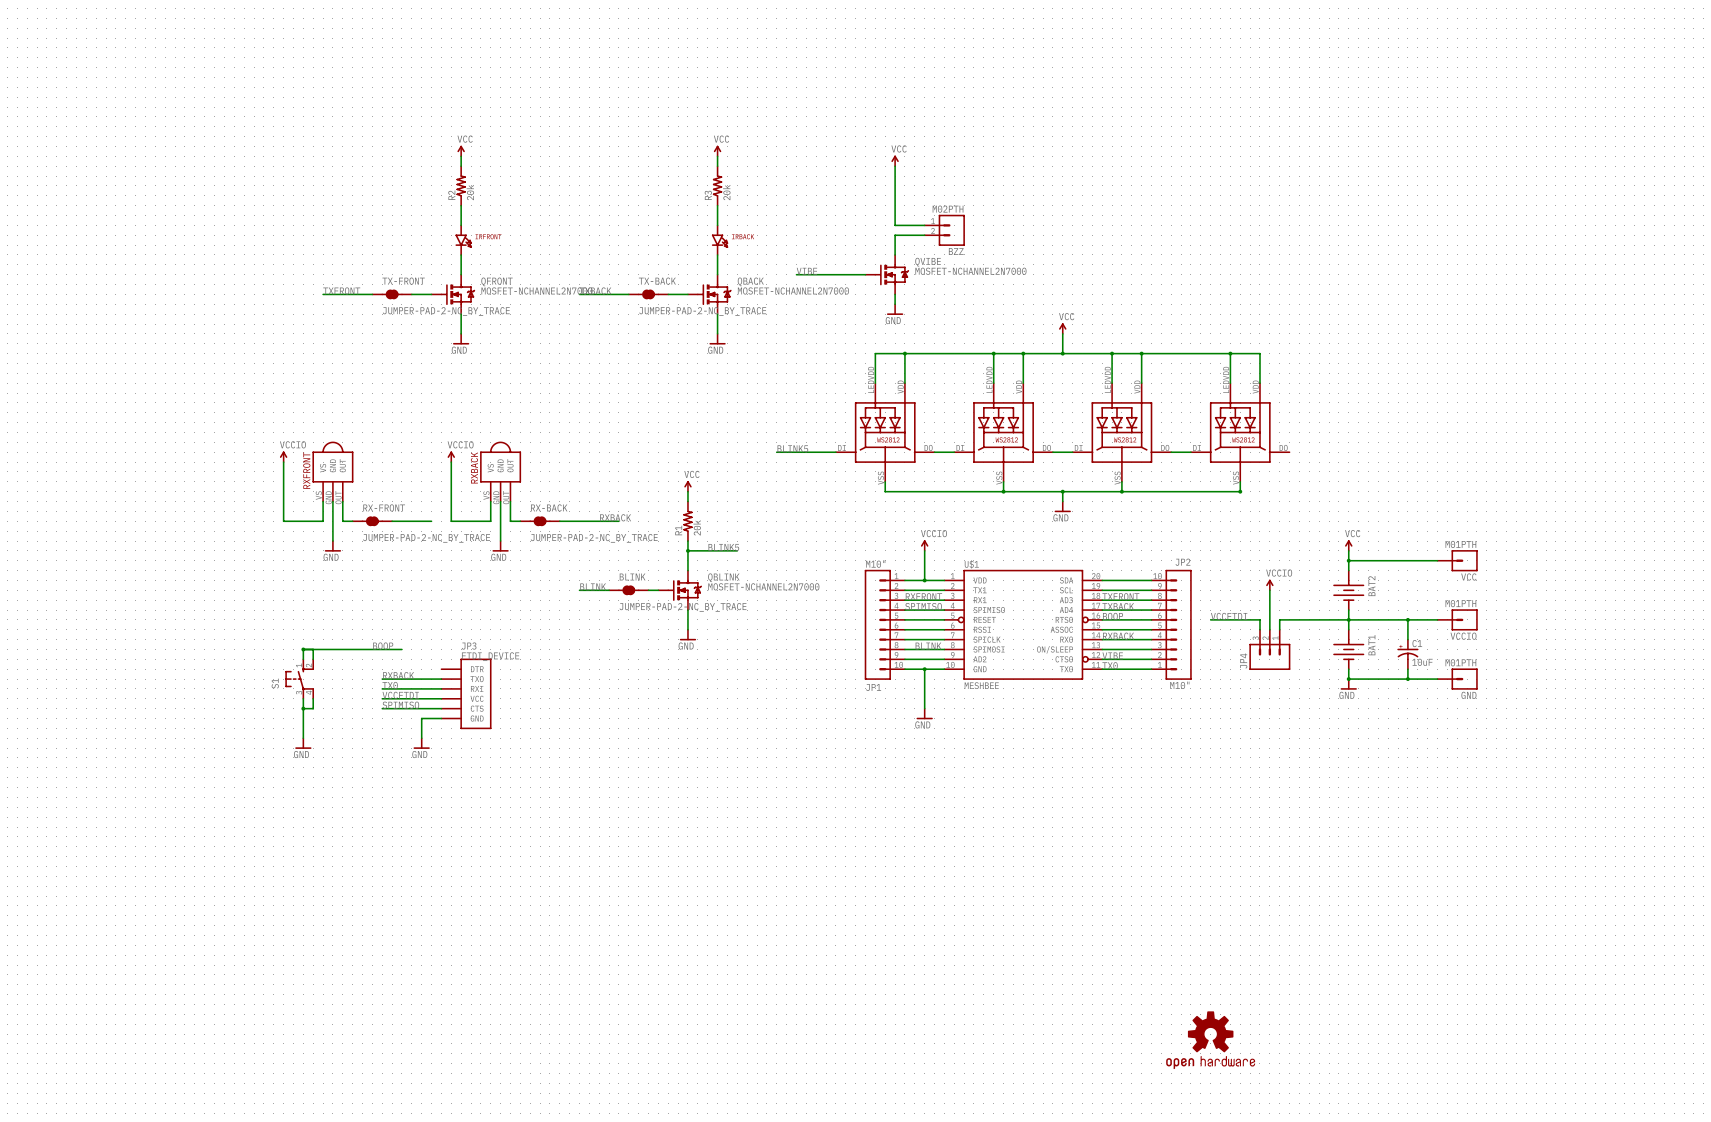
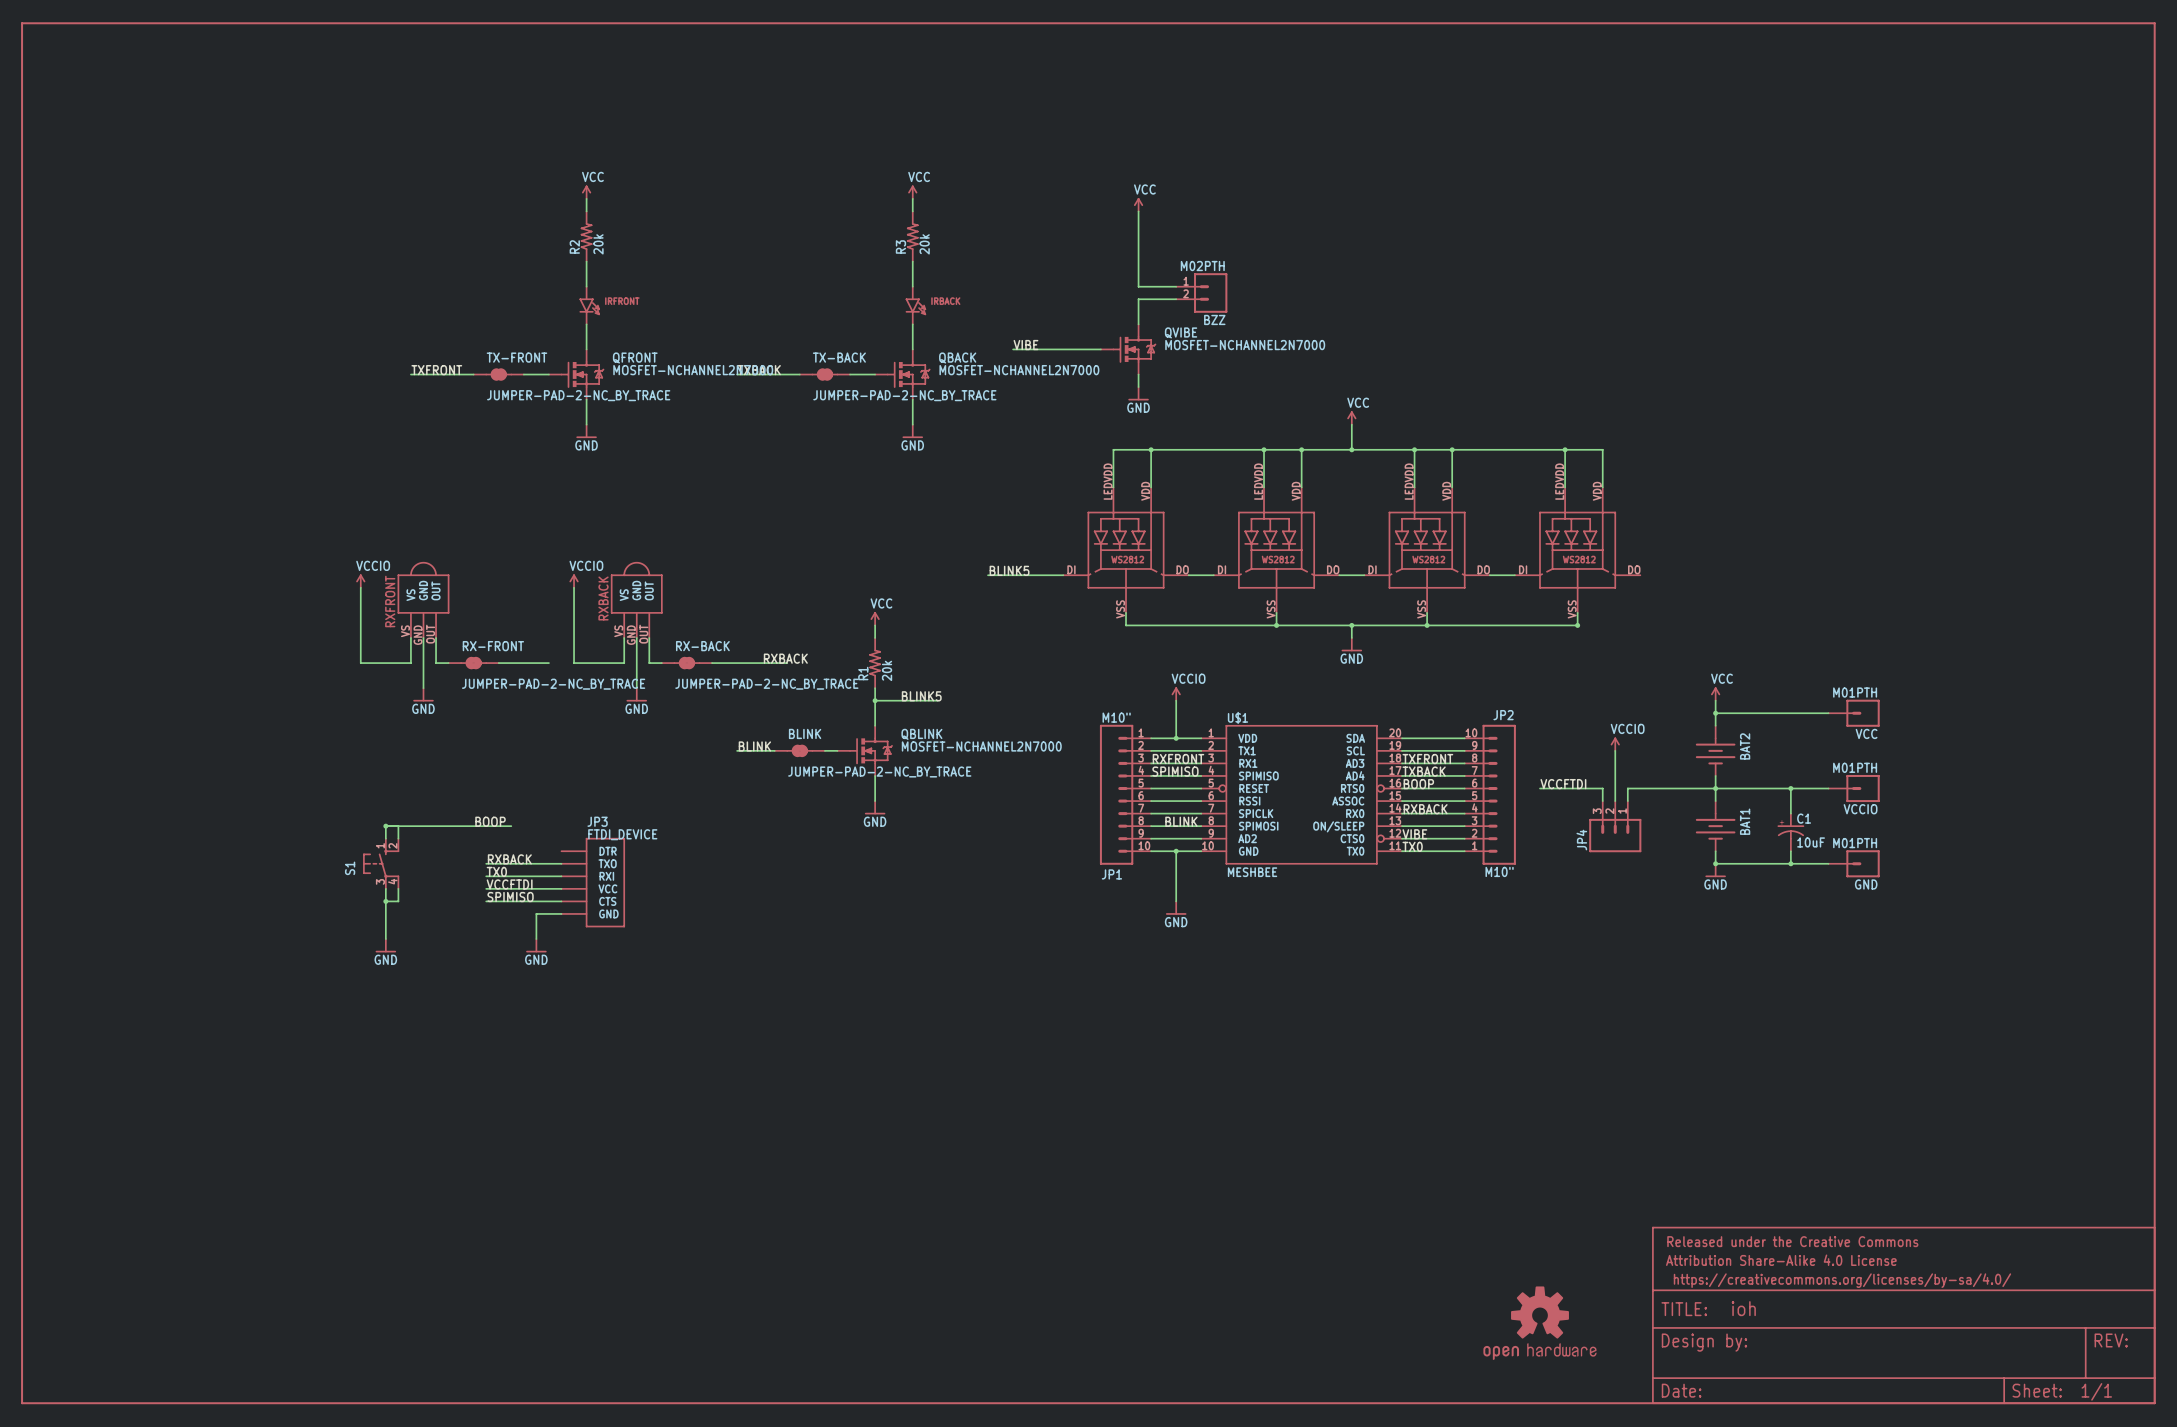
part: none -> (1088, 713)
part: none -> (1903, 1315)

